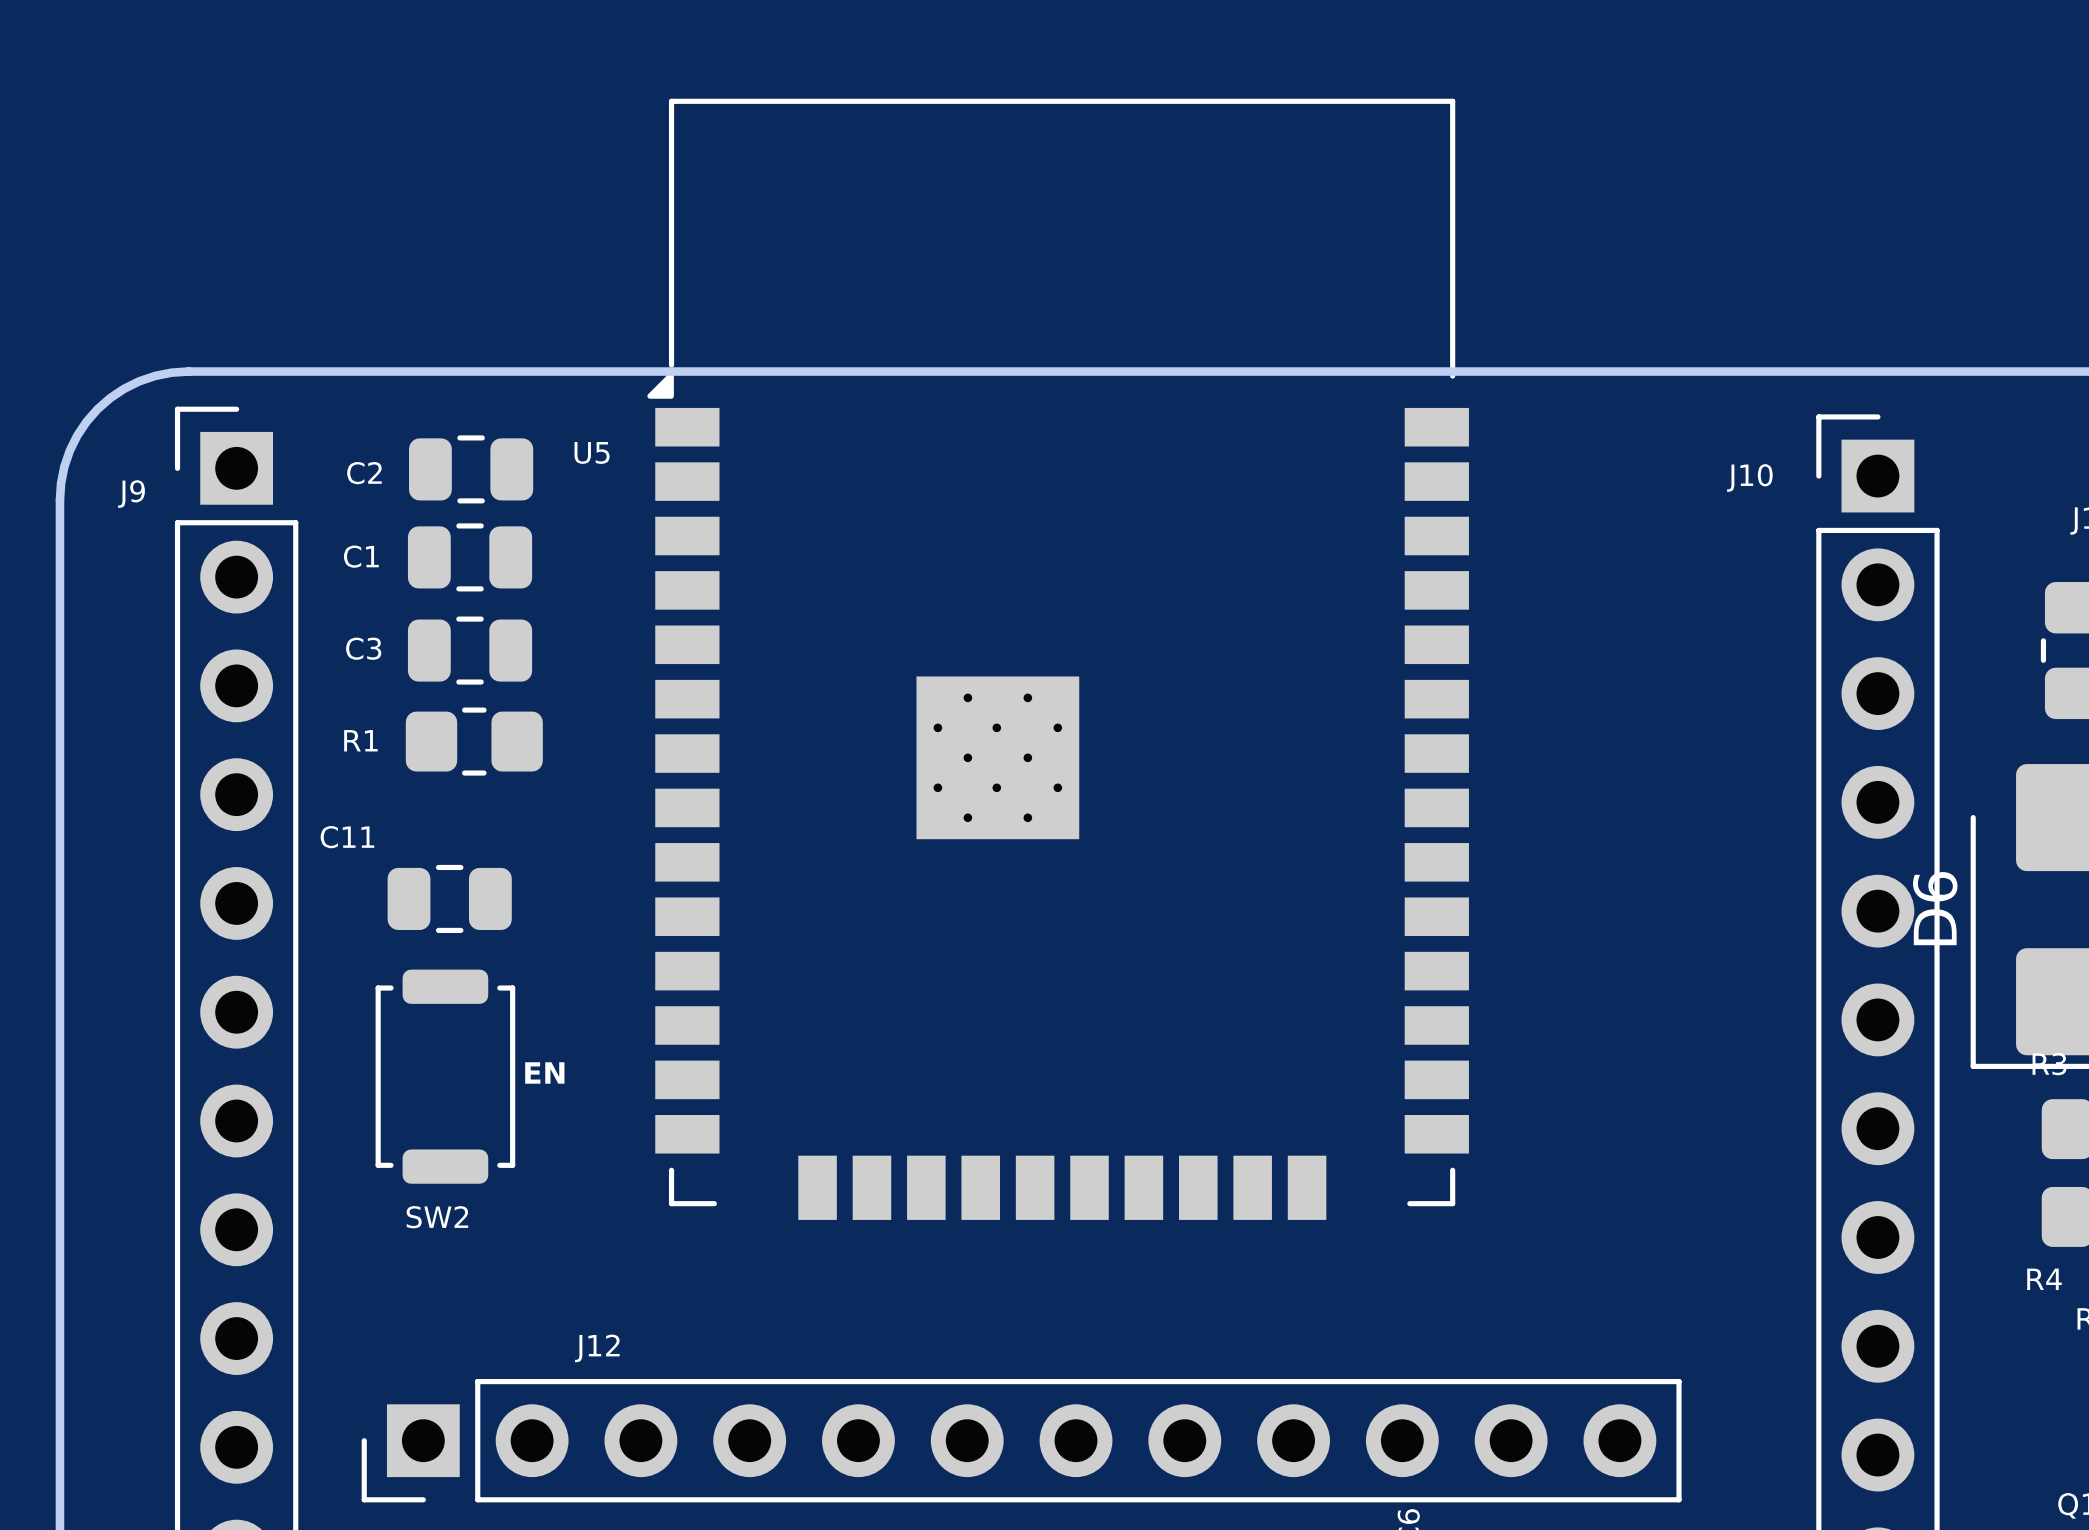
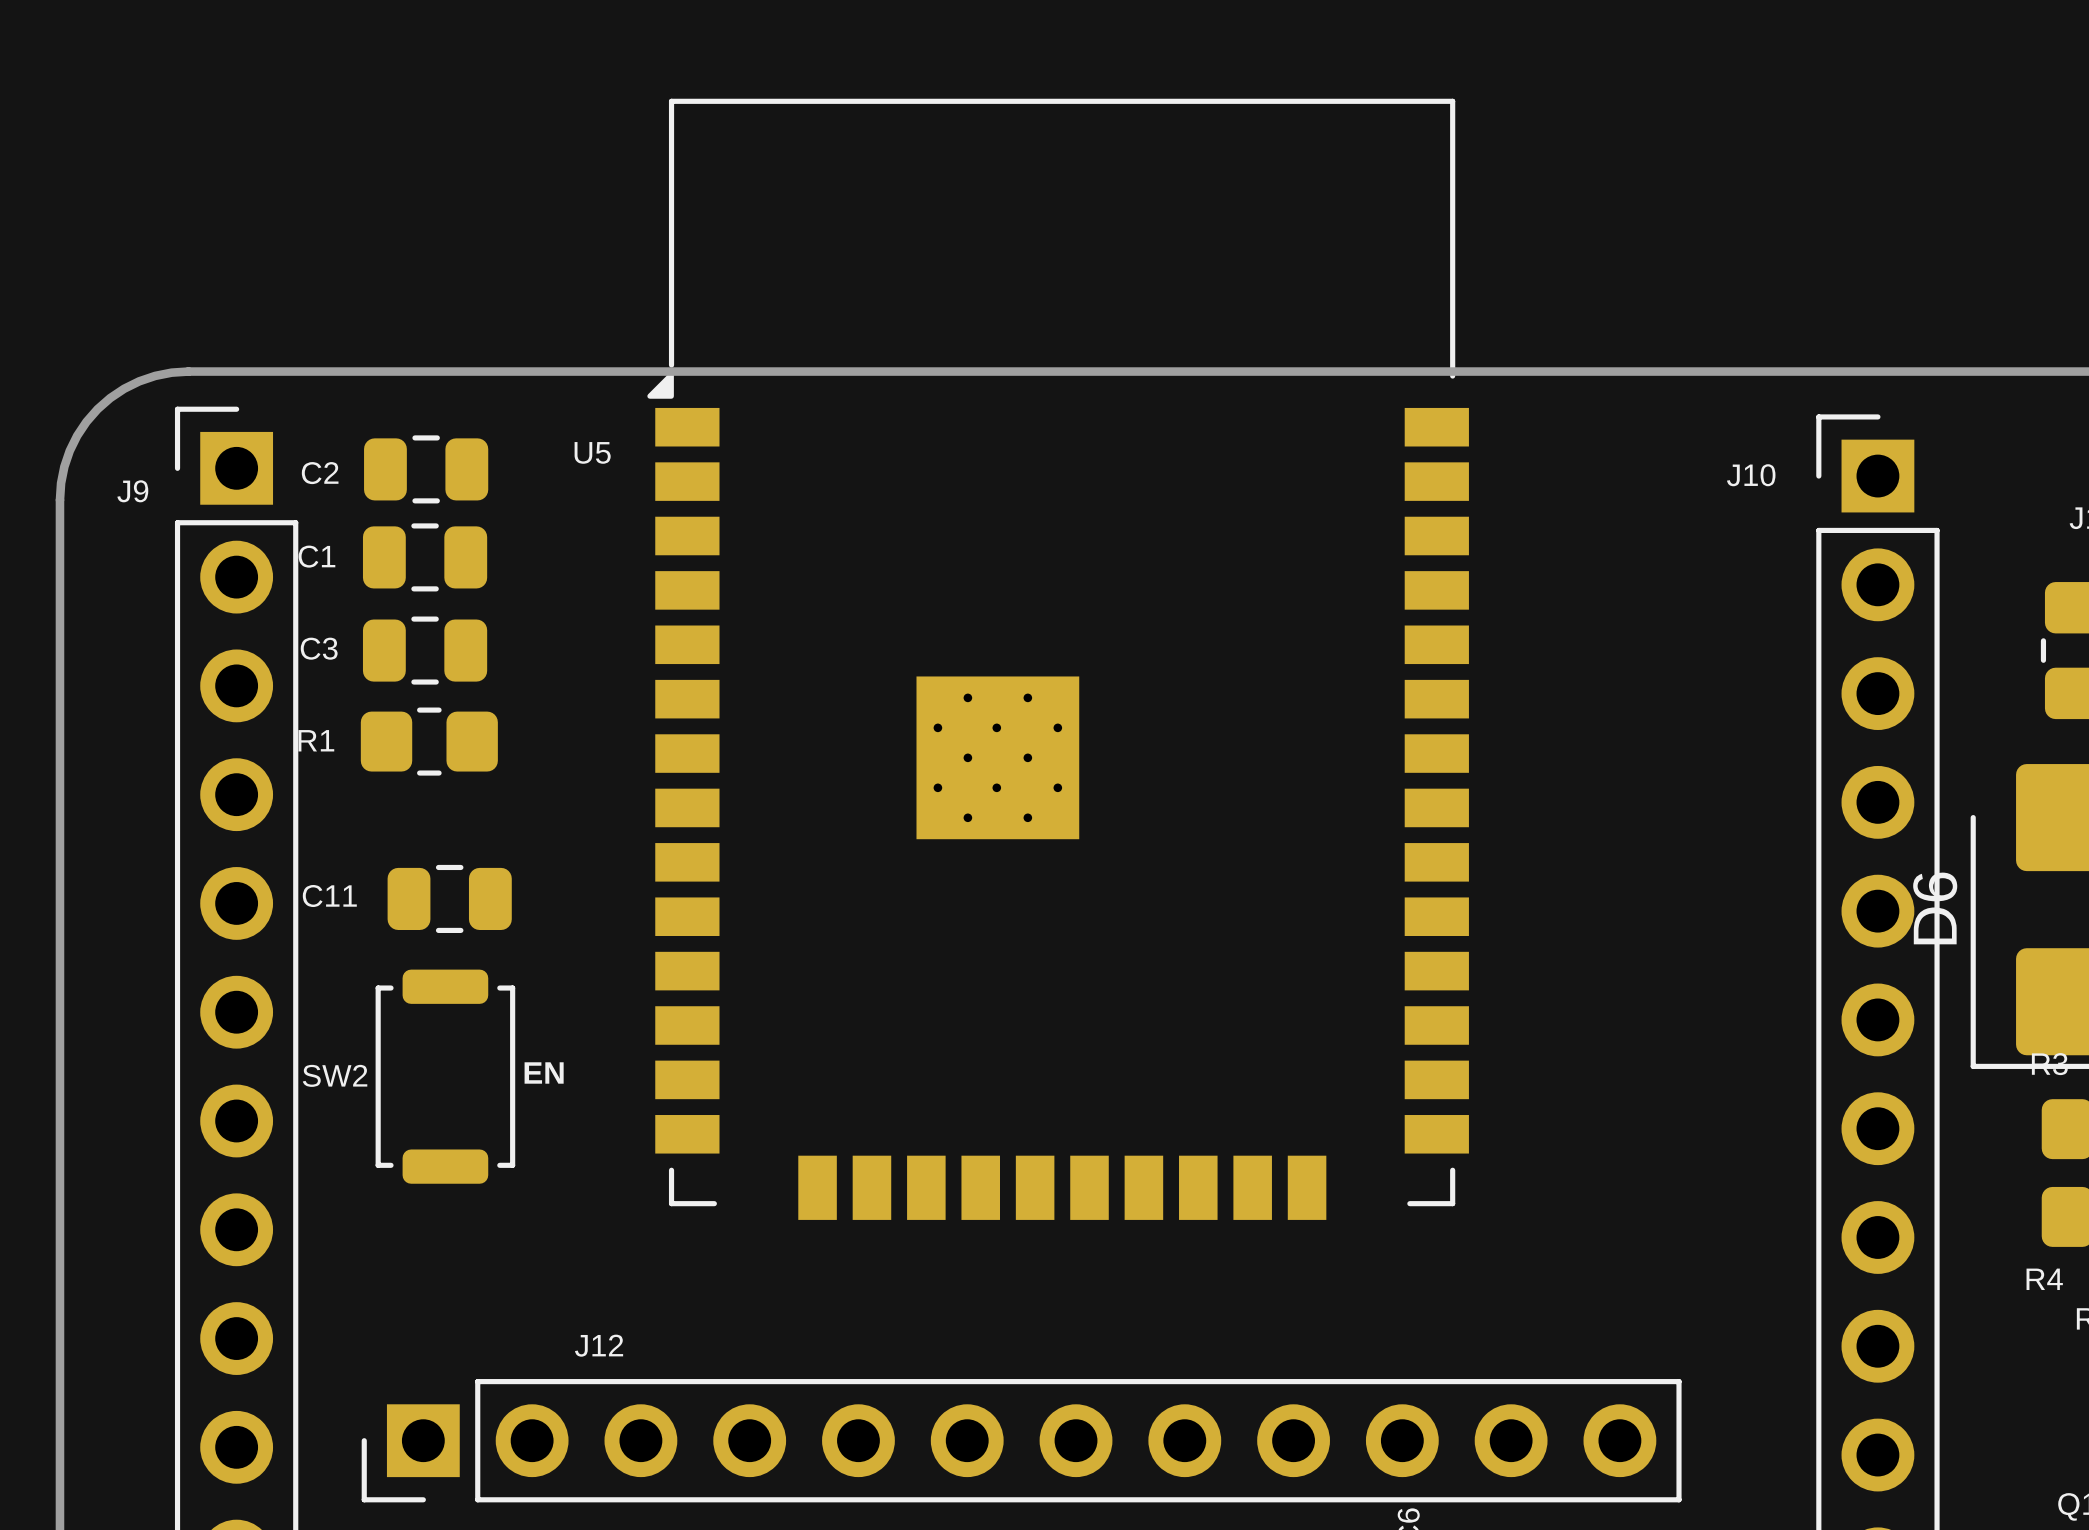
C2 position: (471, 469) -> (426, 469)
C1 position: (470, 557) -> (425, 557)
C3 position: (470, 650) -> (425, 650)
R1 position: (474, 741) -> (429, 741)
C11 name position: C11 (347, 837) -> C11 (329, 896)
SW2 name position: SW2 (437, 1217) -> SW2 (335, 1075)

